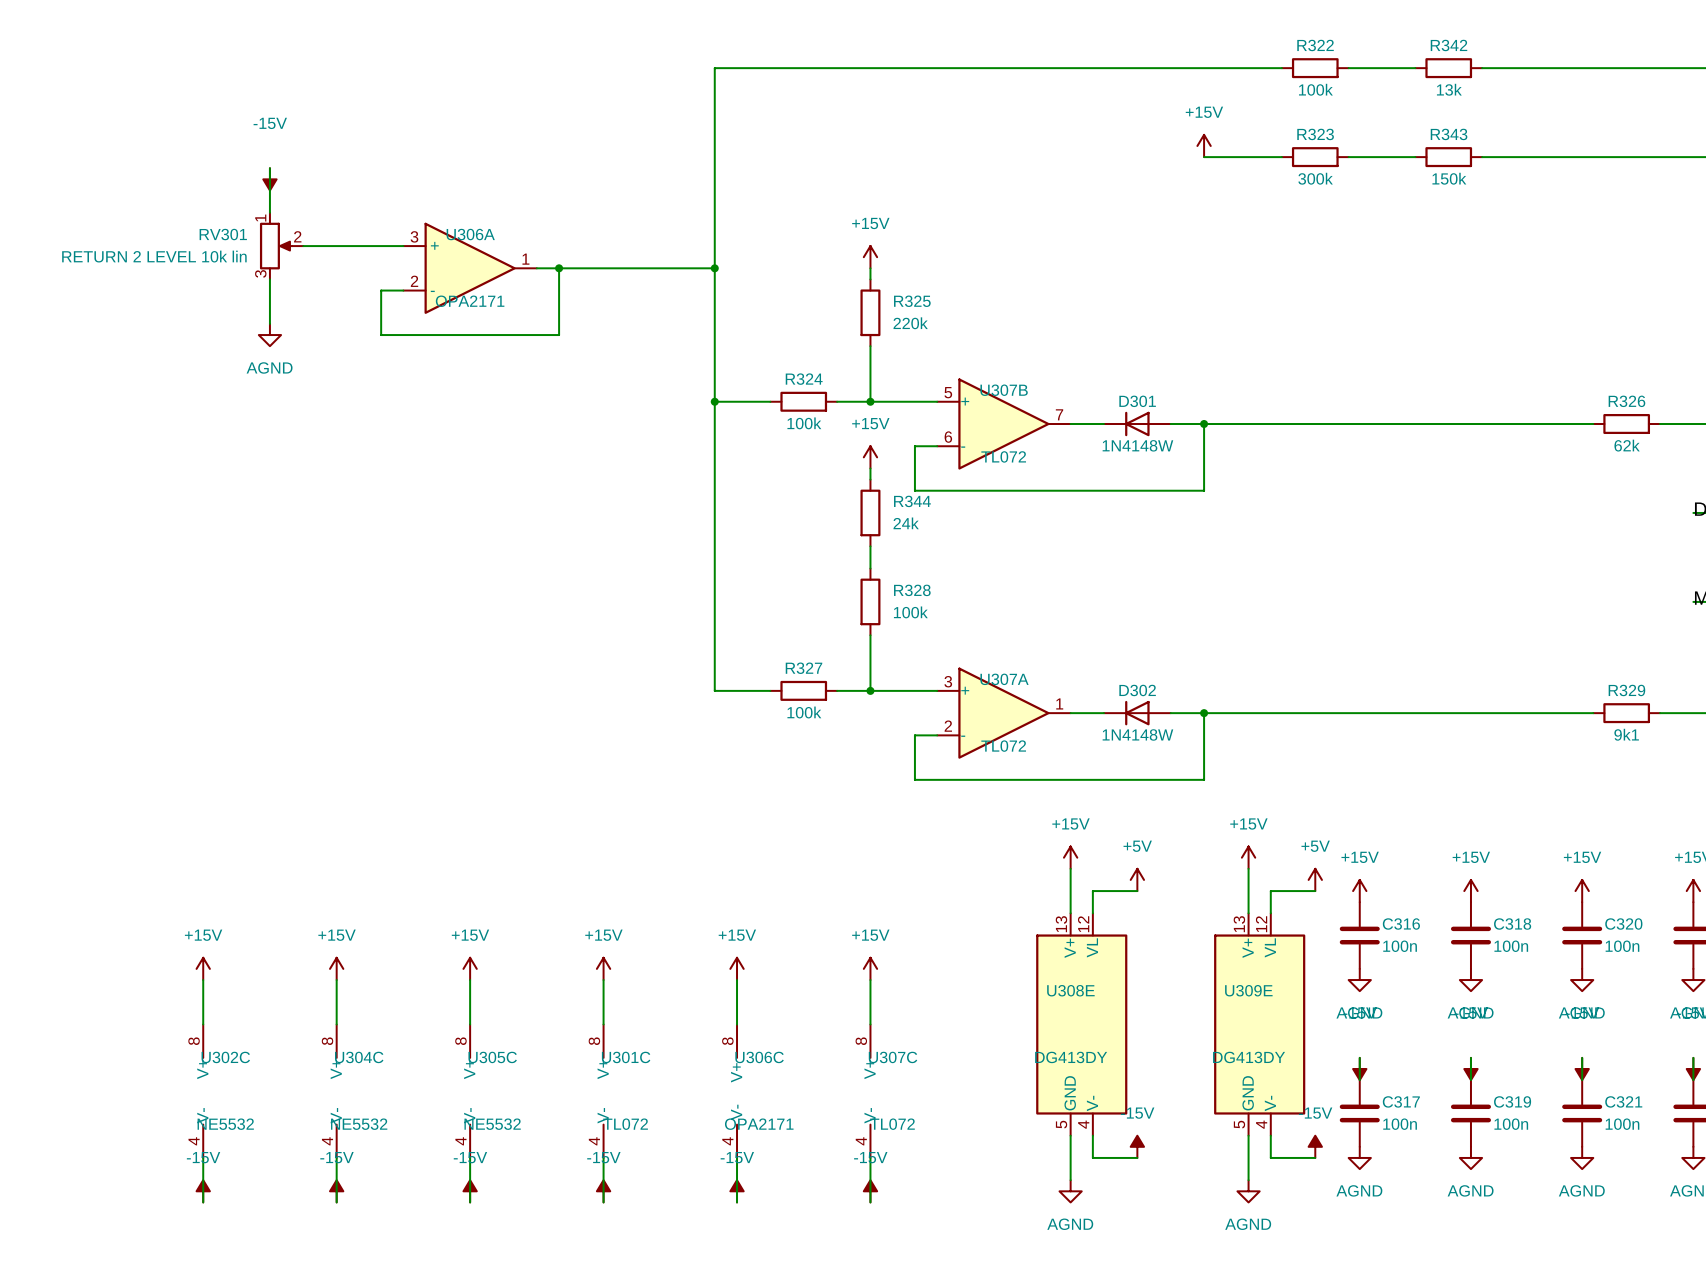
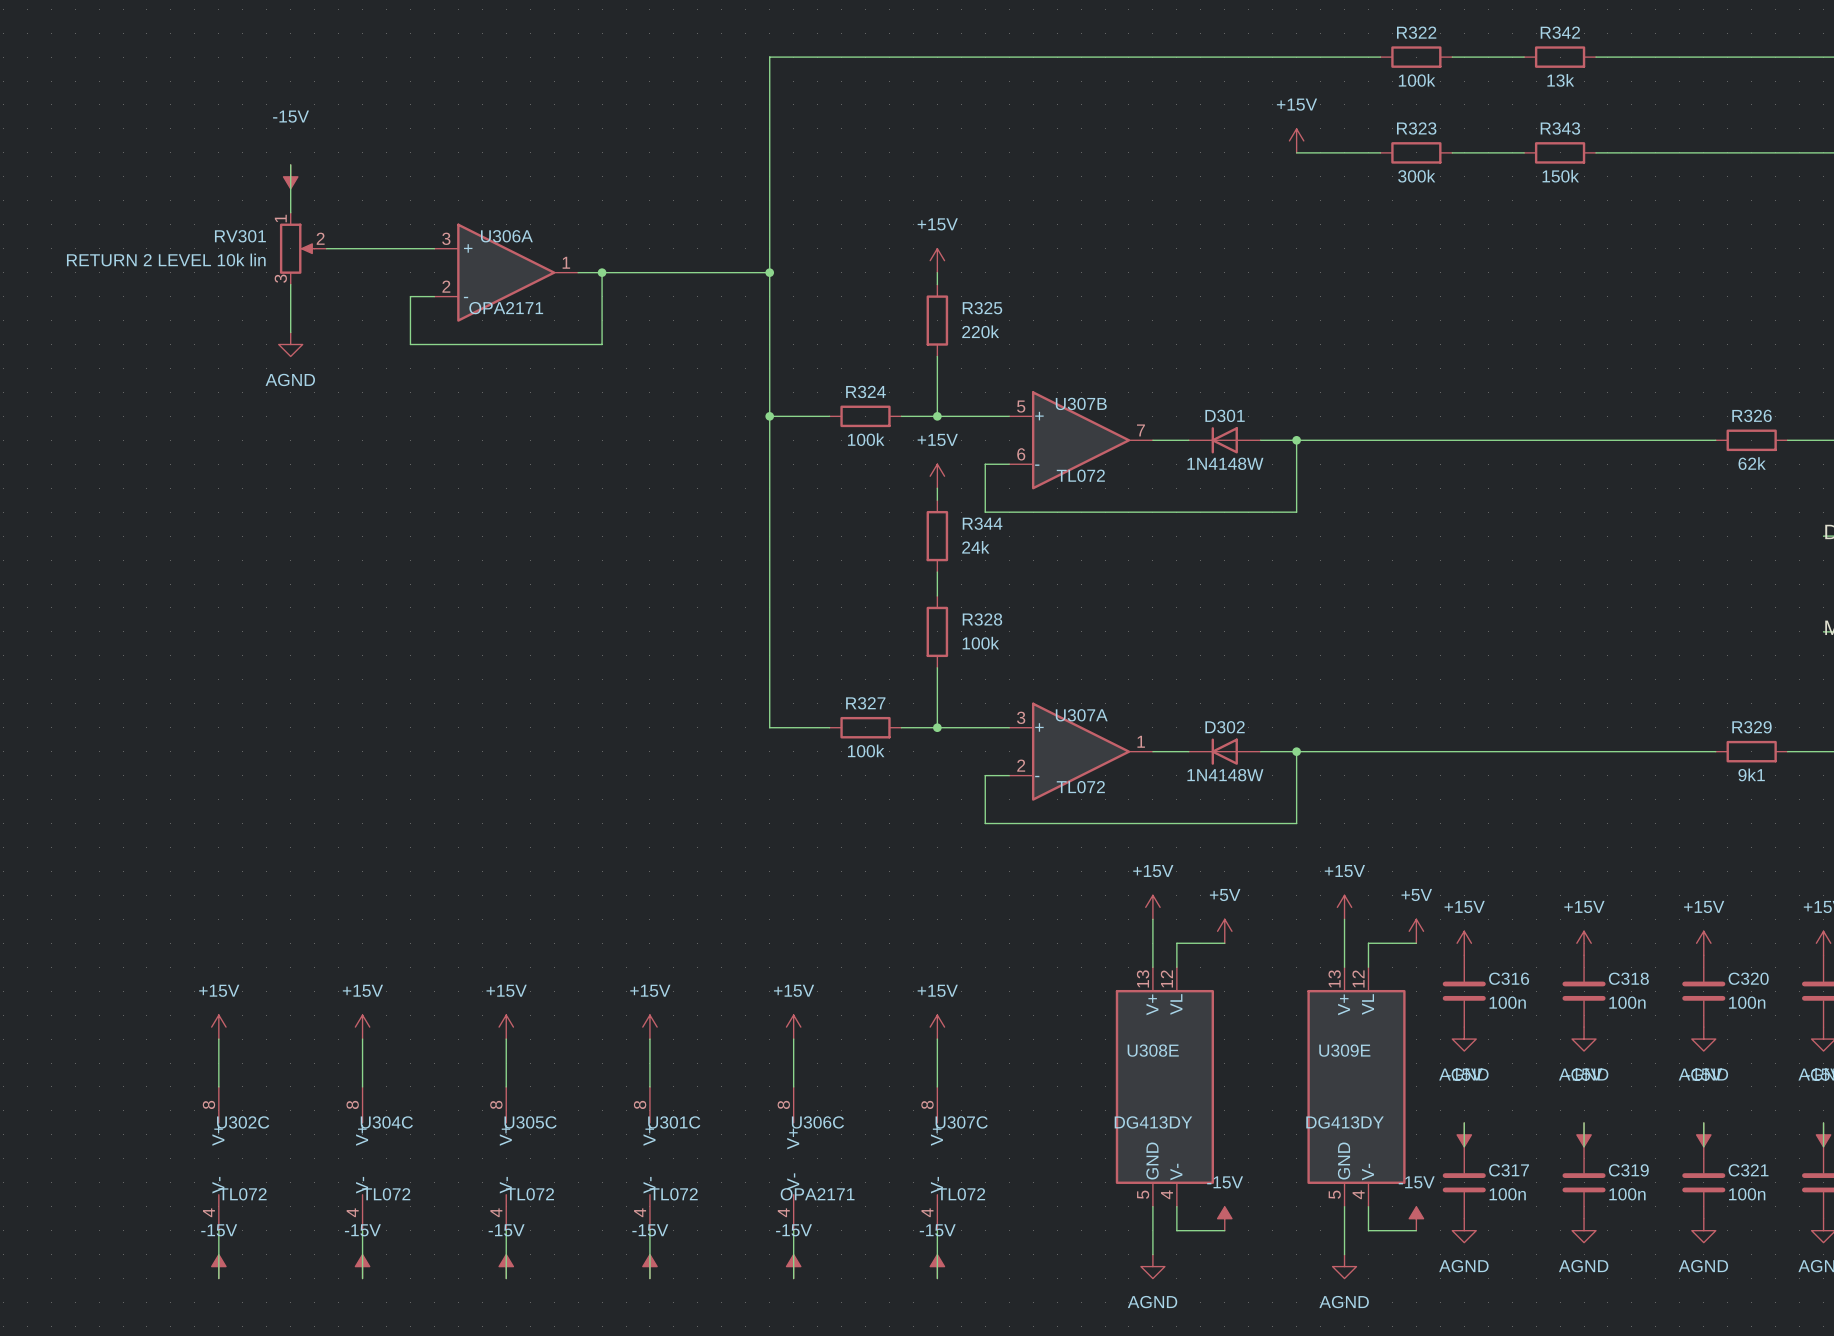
U302C value: NE5532 (225, 1124) -> TL072 (242, 1194)
U304C value: NE5532 (359, 1124) -> TL072 (386, 1194)
U305C value: NE5532 (492, 1124) -> TL072 (529, 1194)

